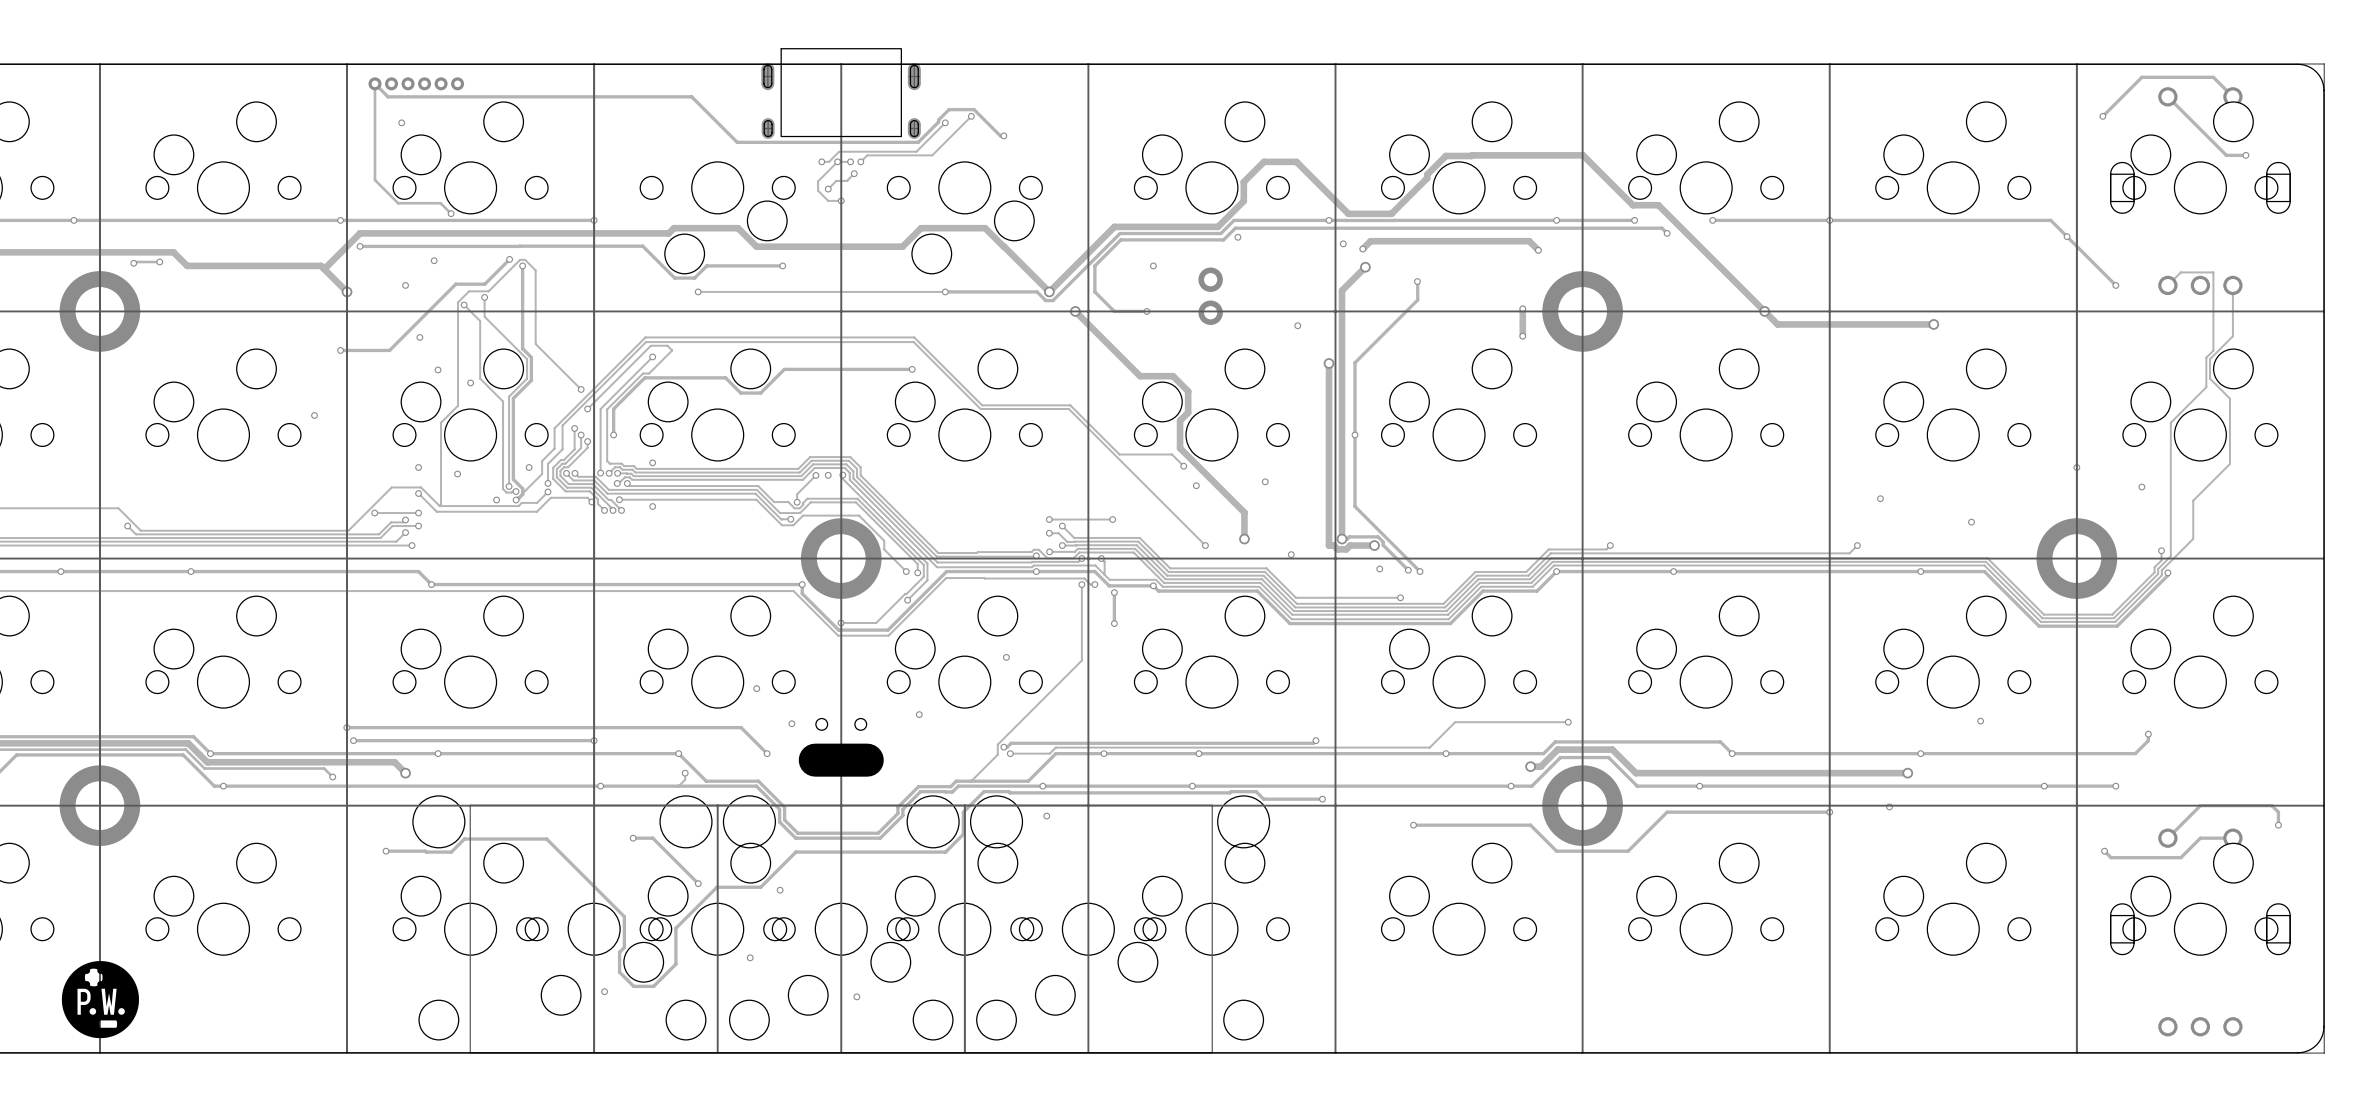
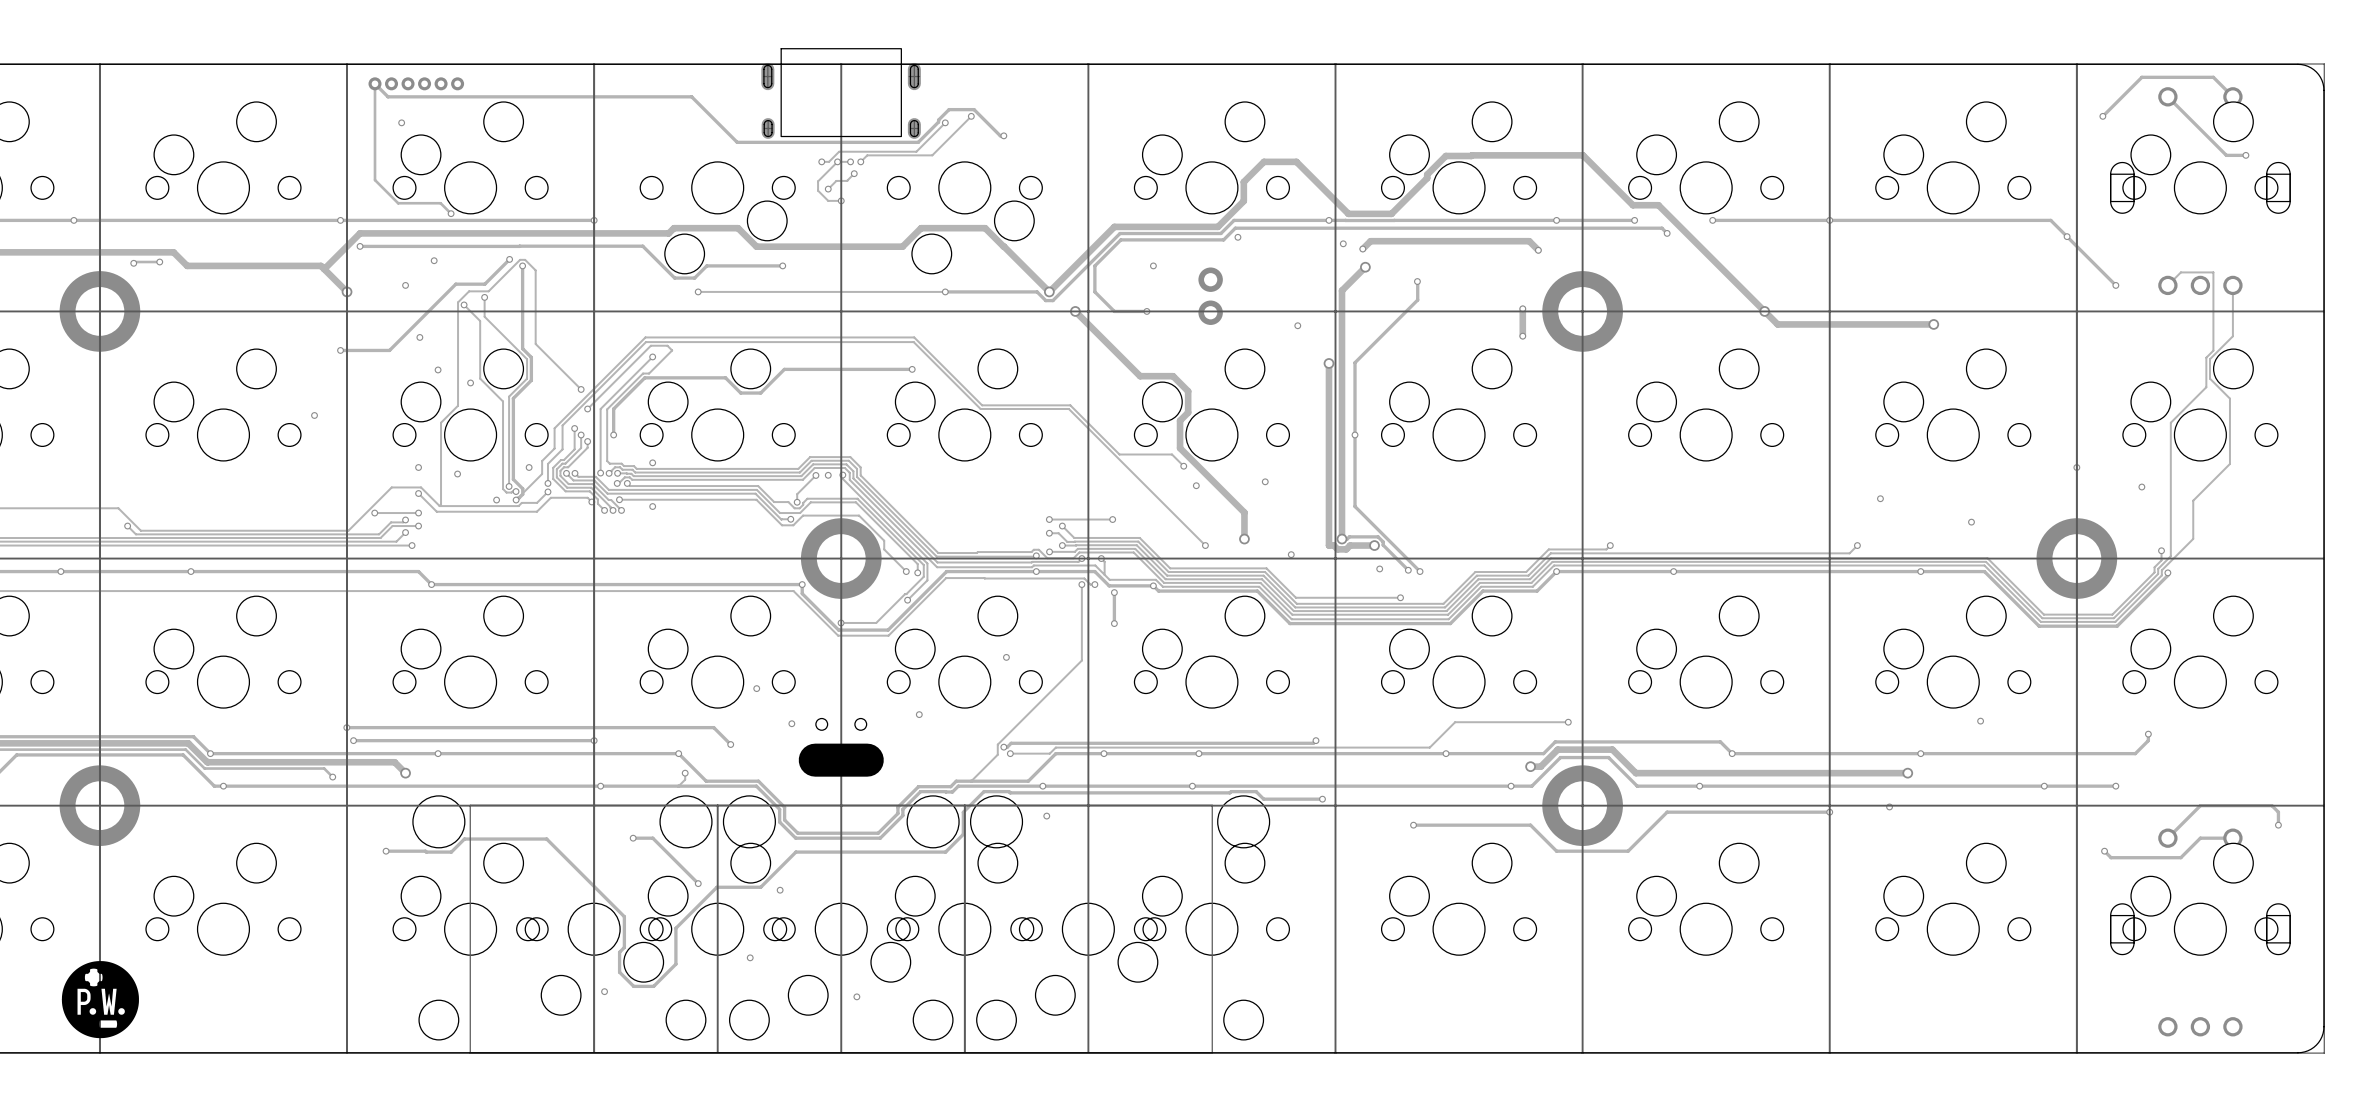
track: (713, 727) (741, 727) (767, 753) -> (713, 727) (730, 744)
via position: (767, 753) -> (730, 744)

